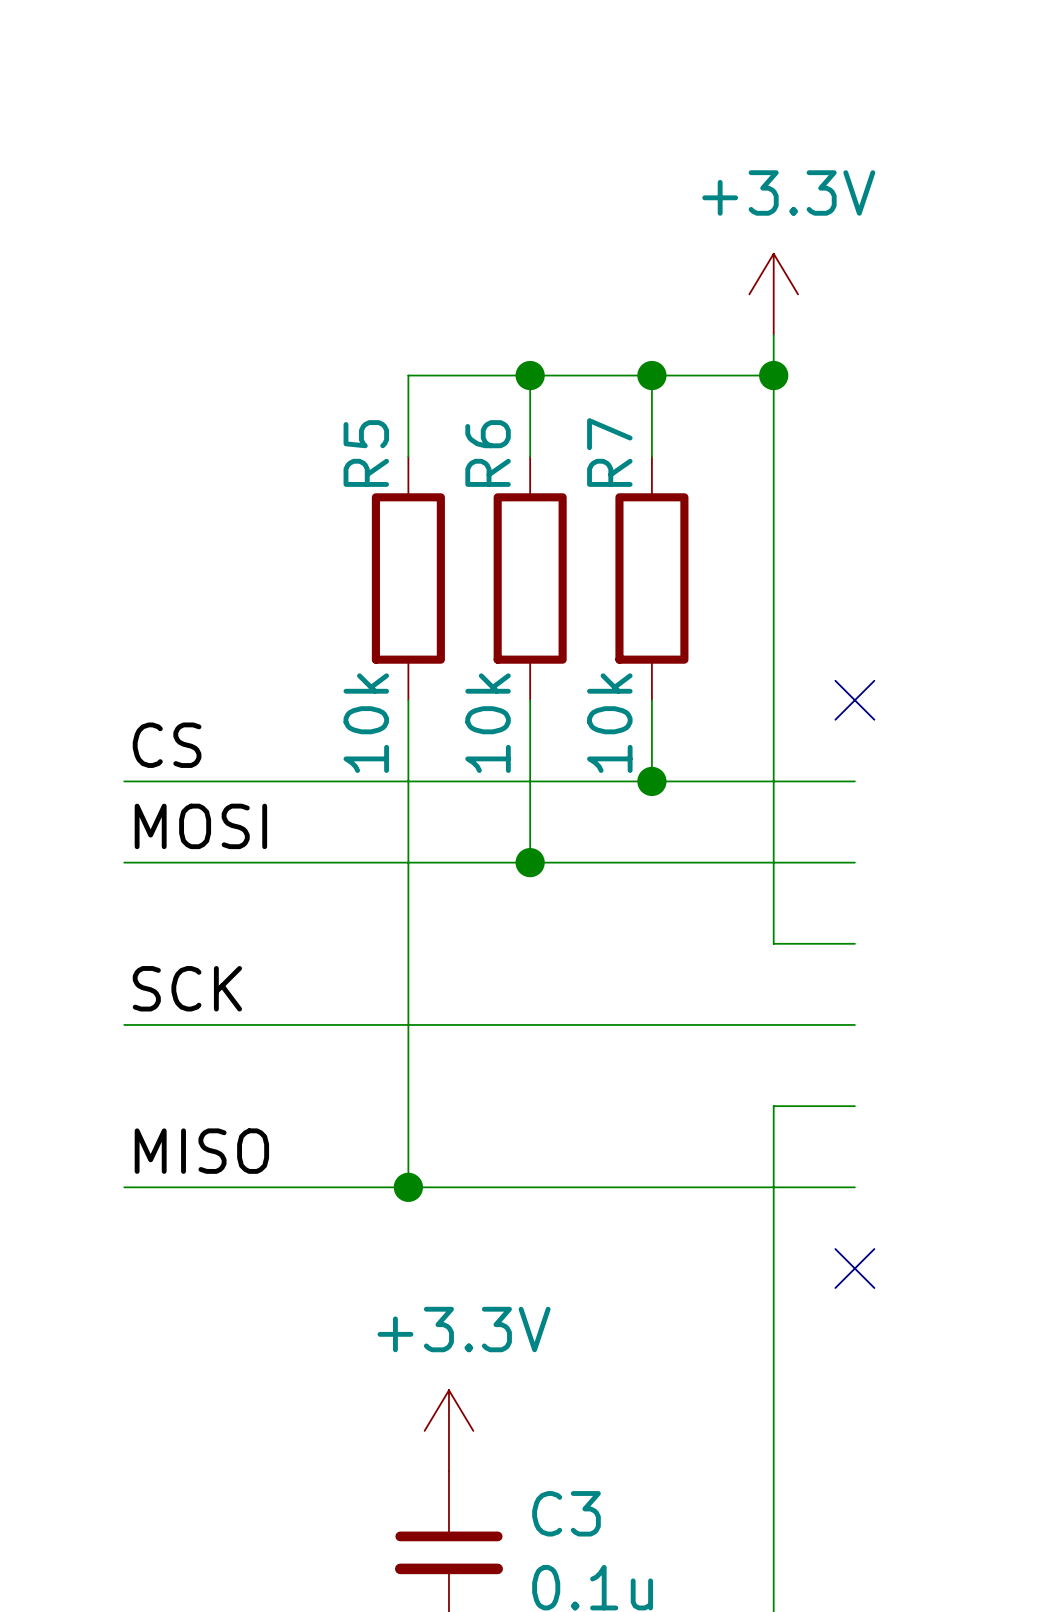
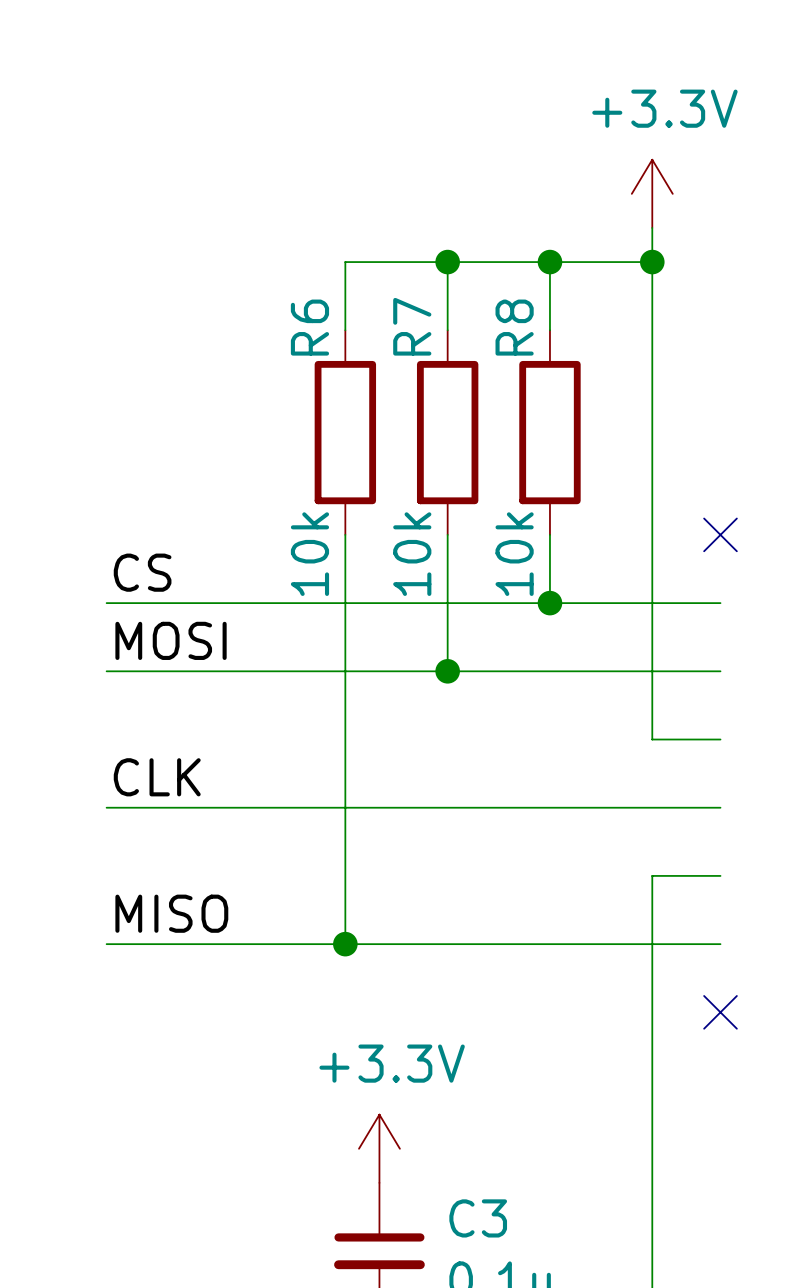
R7 name: R7 (609, 452) -> R8 (514, 327)
R5 name: R5 (366, 453) -> R6 (309, 327)
R6 name: R6 (488, 453) -> R7 (412, 326)
label: SCK (187, 988) -> CLK (157, 777)

